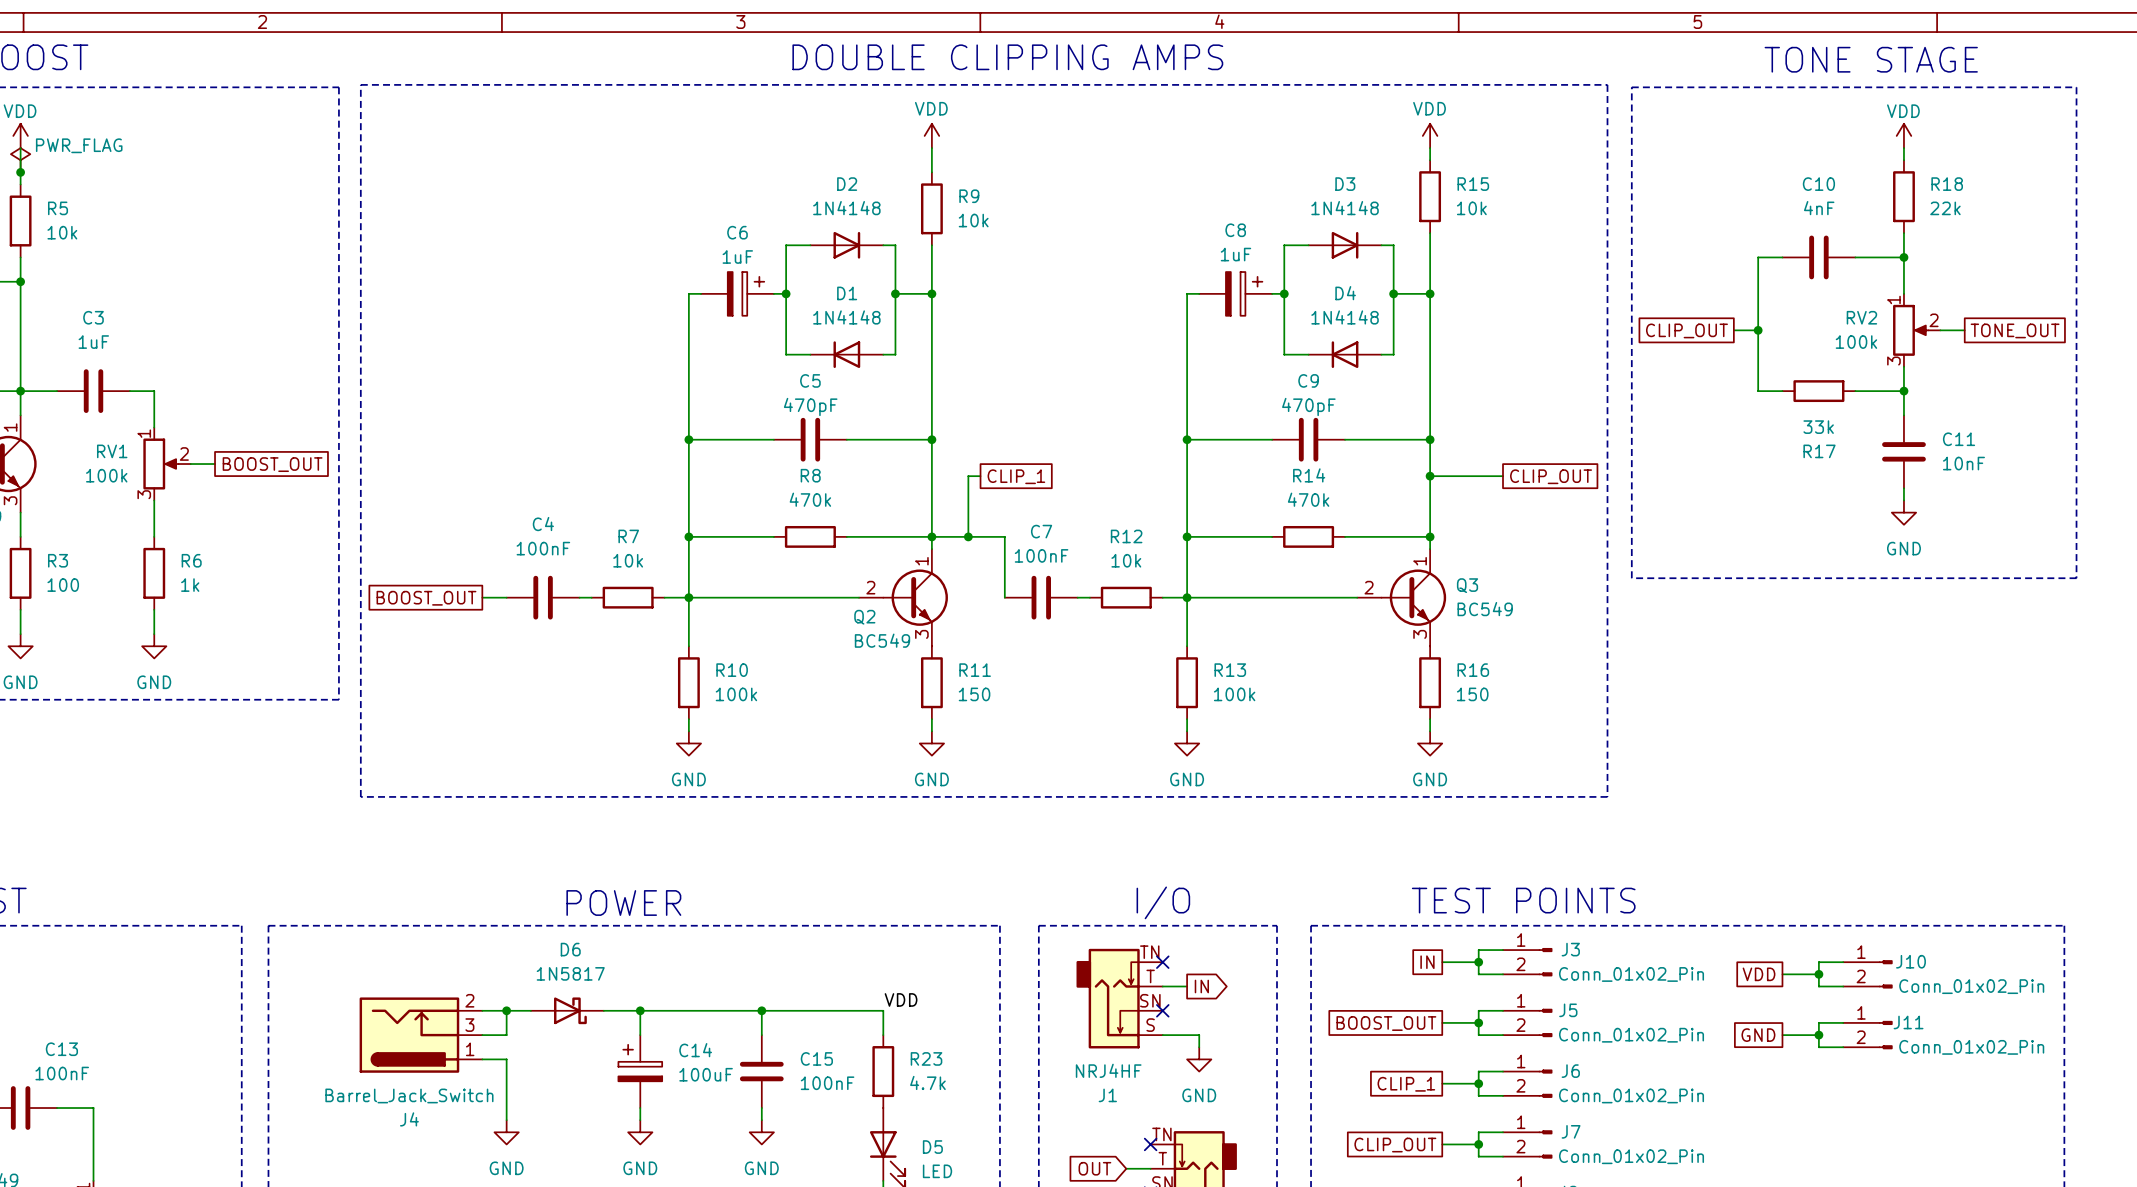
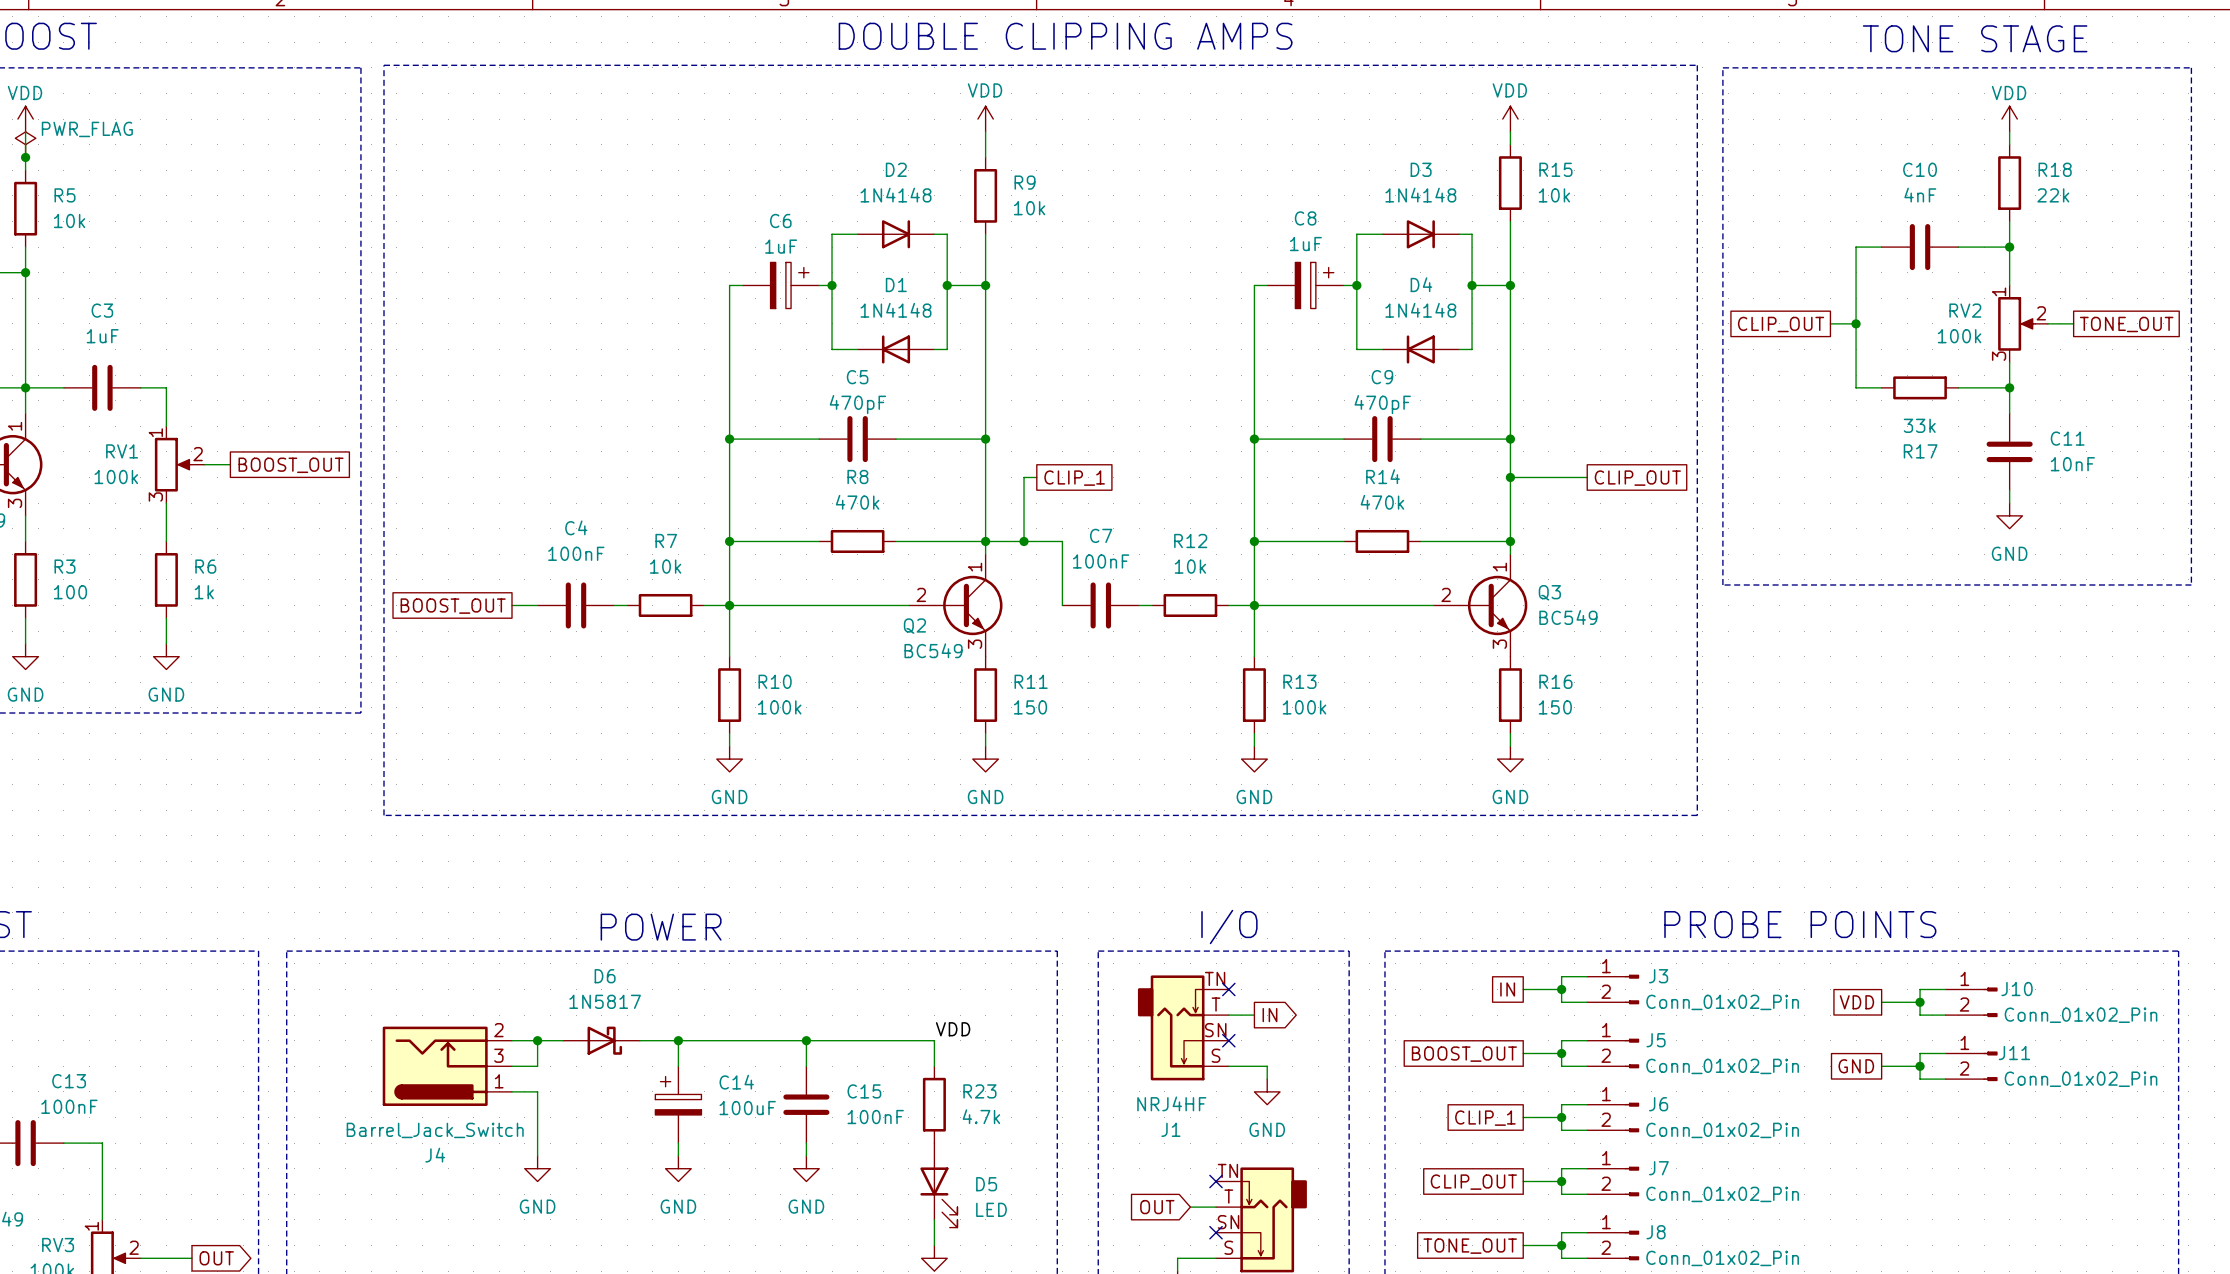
text: TEST POINTS (1523, 900) -> PROBE POINTS (1800, 924)

